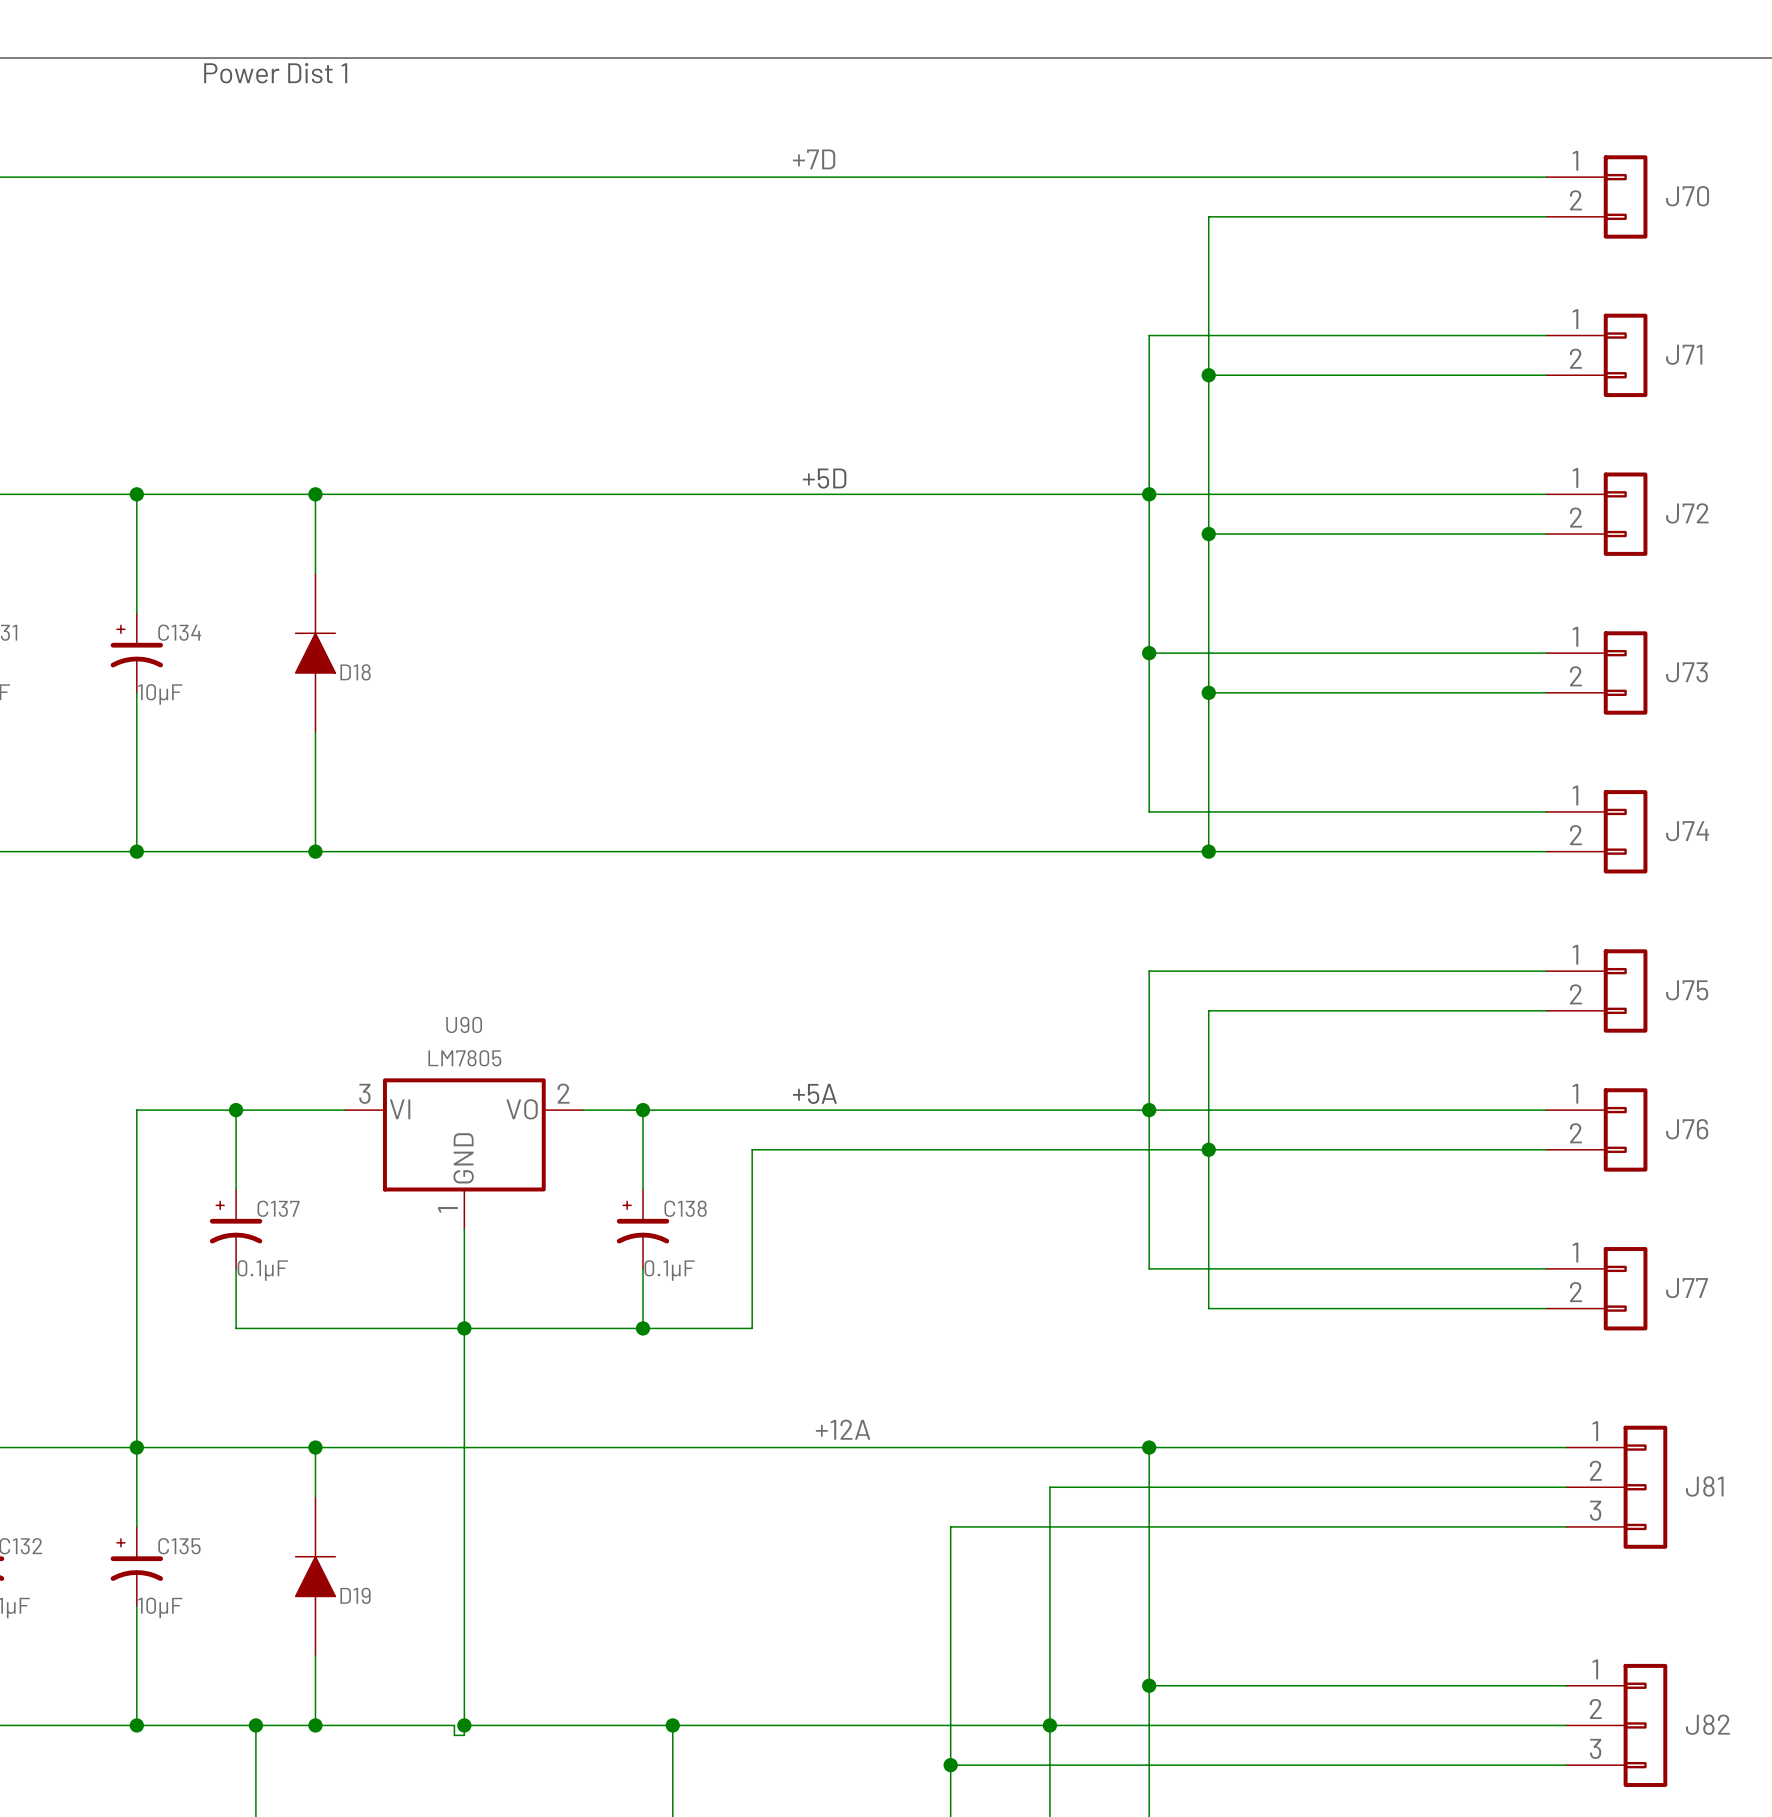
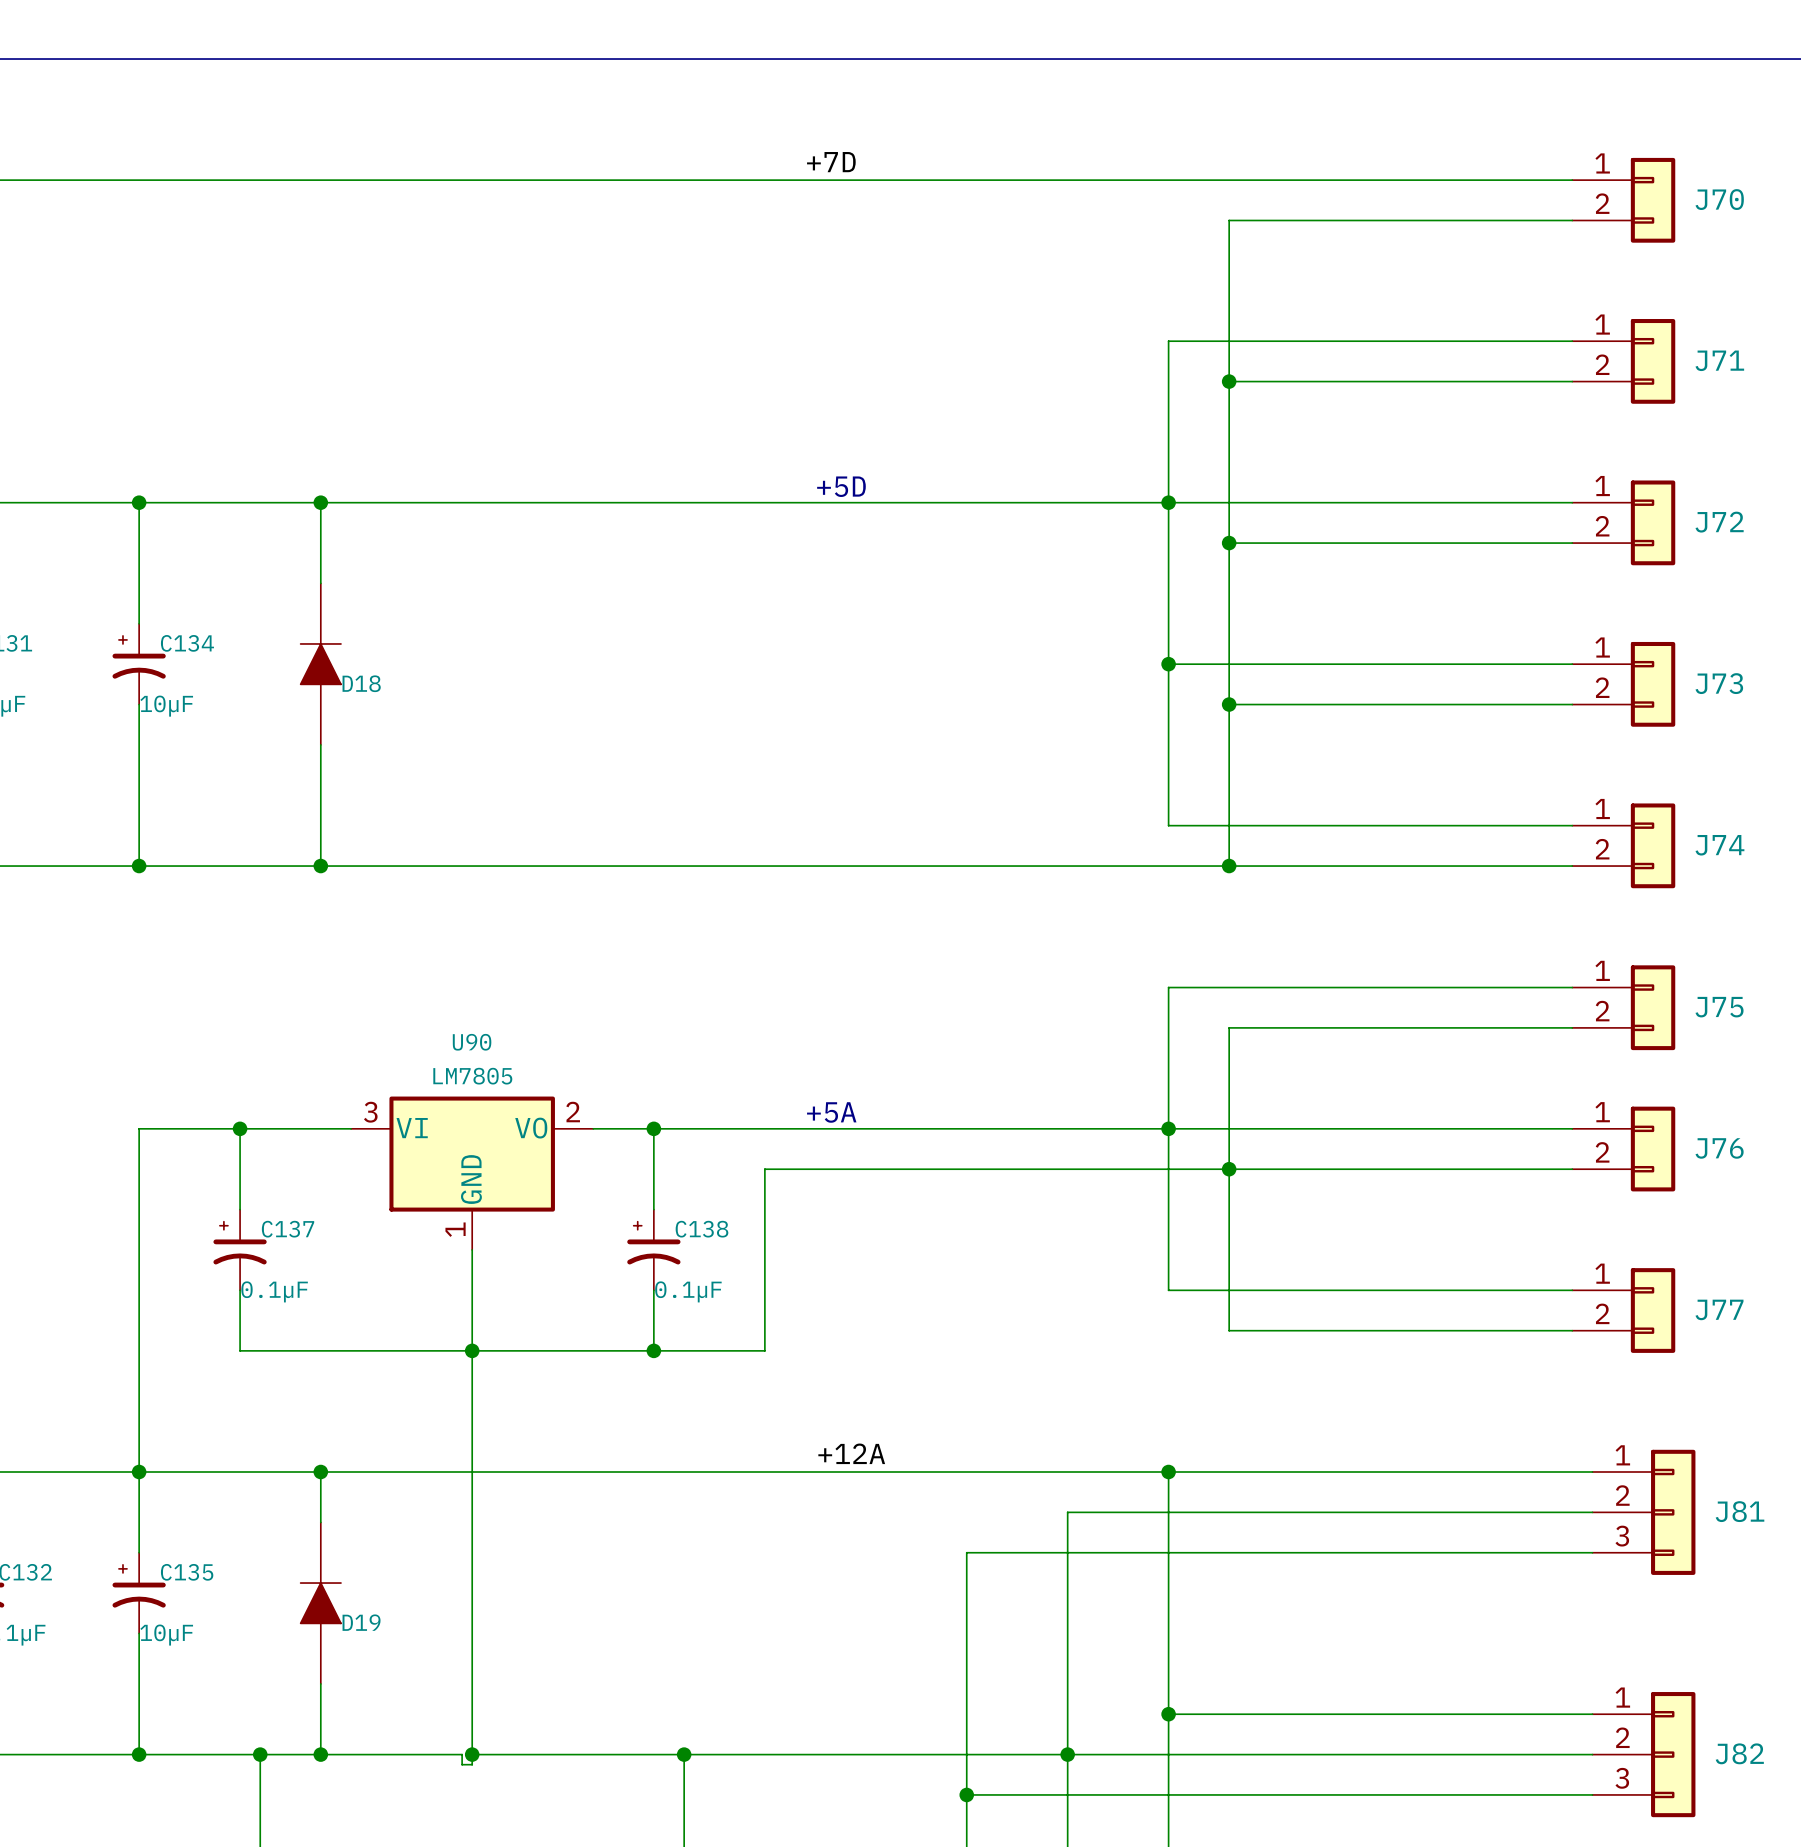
text: Power Dist 1 (275, 73) -> none

